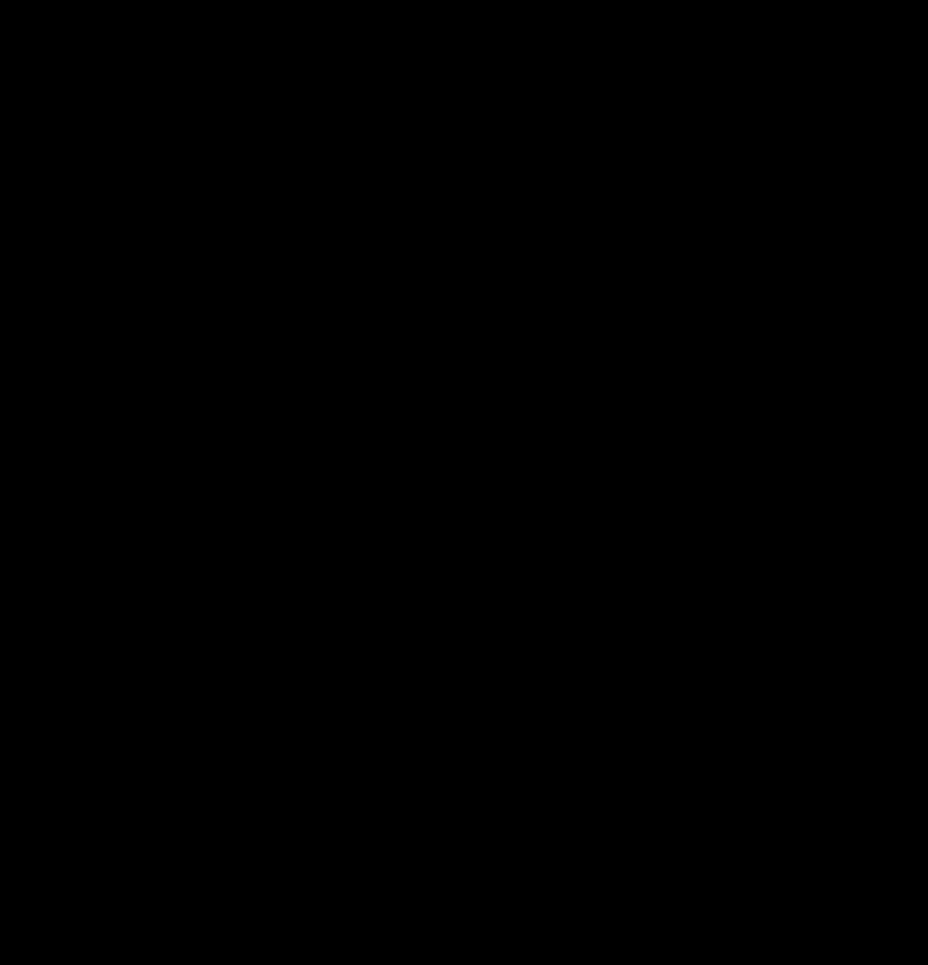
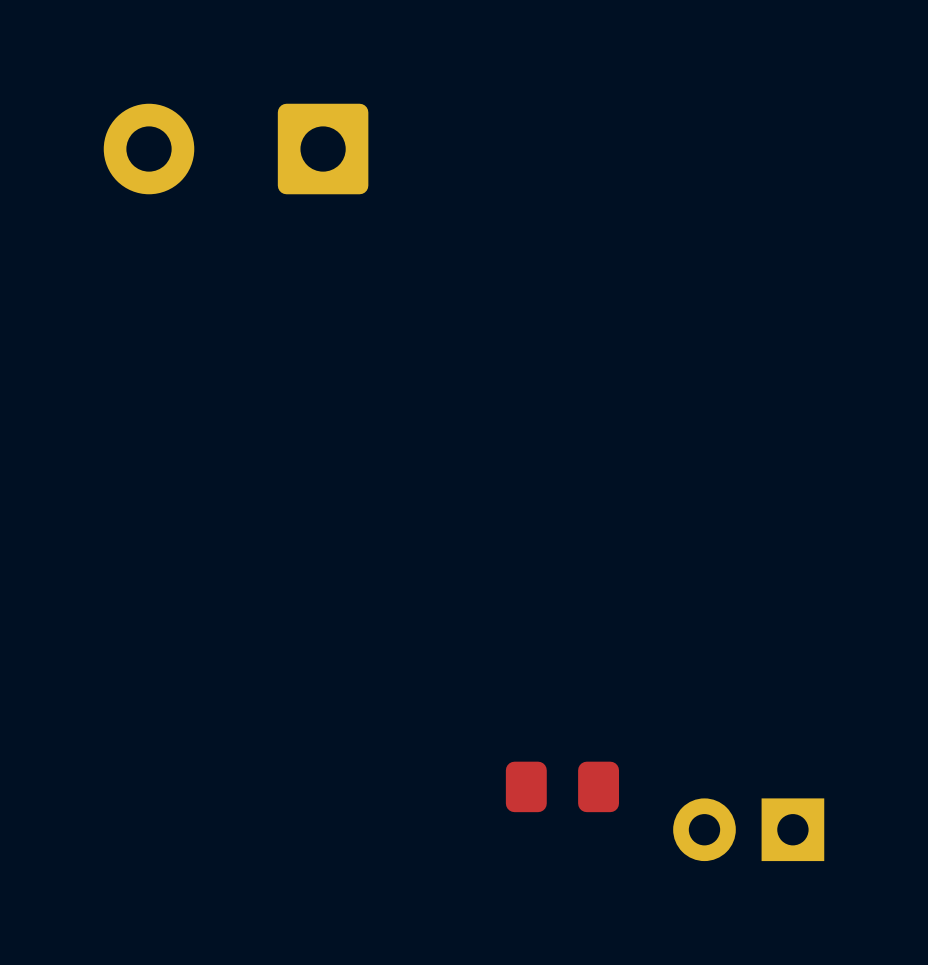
part: none -> (236, 149)
part: none -> (562, 786)
part: none -> (748, 829)

